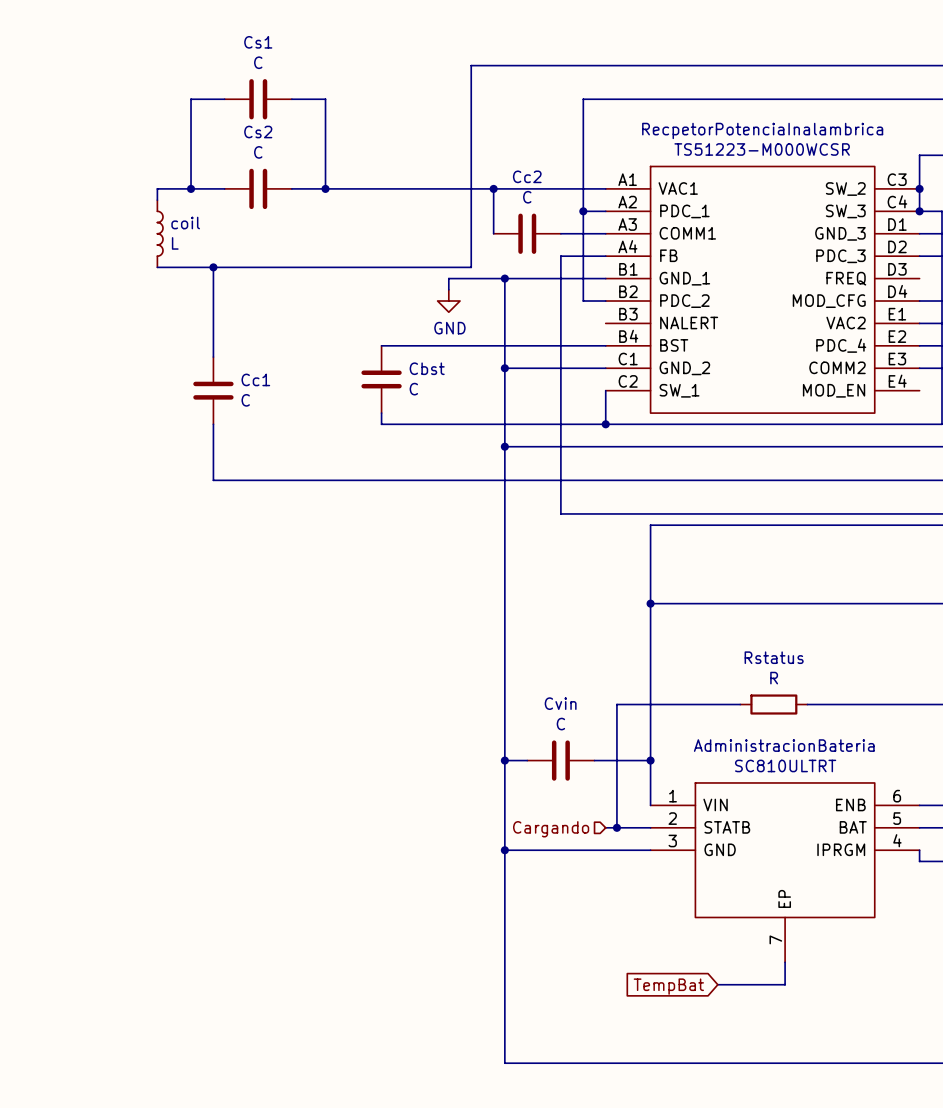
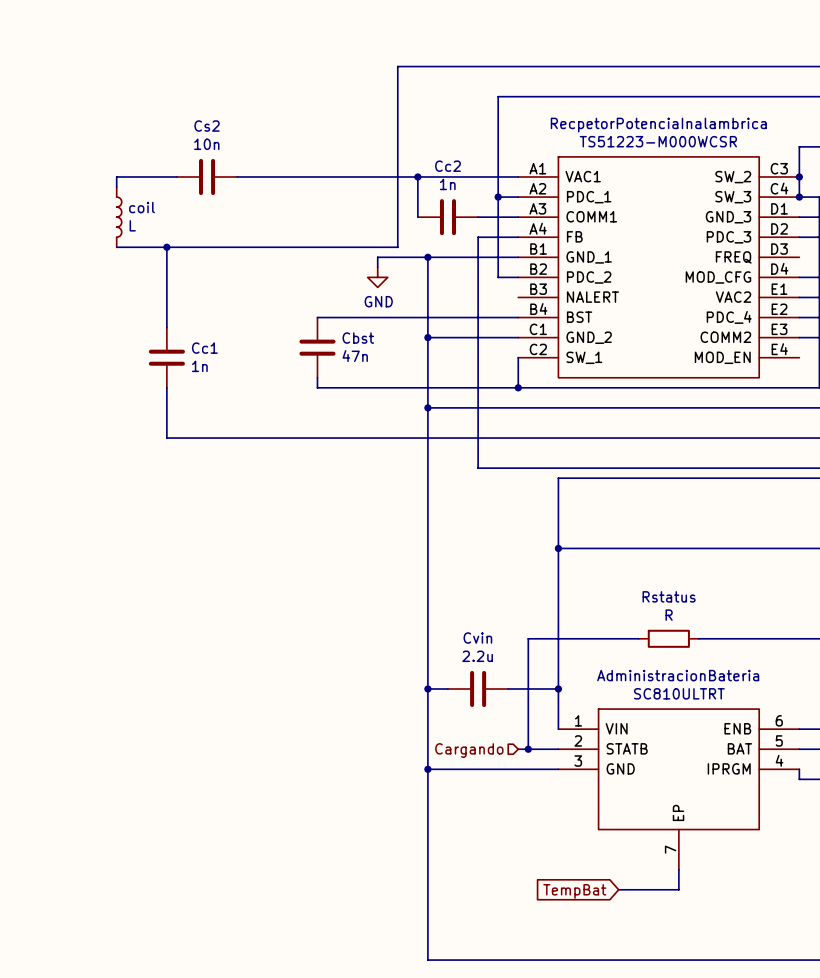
wire: (224, 99) (191, 99) (191, 188) -> none
Cs1: C (258, 99) -> none
wire: (291, 99) (325, 99) (325, 188) -> none
Cs2 value: C (258, 152) -> 10n (206, 144)
junction: (191, 188) -> none
junction: (325, 188) -> none
Cc2 value: C (527, 197) -> 1n (447, 184)
Cbst value: C (413, 389) -> 47n (355, 356)
Cc1 value: C (245, 400) -> 1n (199, 366)
Cvin value: C (560, 724) -> 2.2u (477, 656)

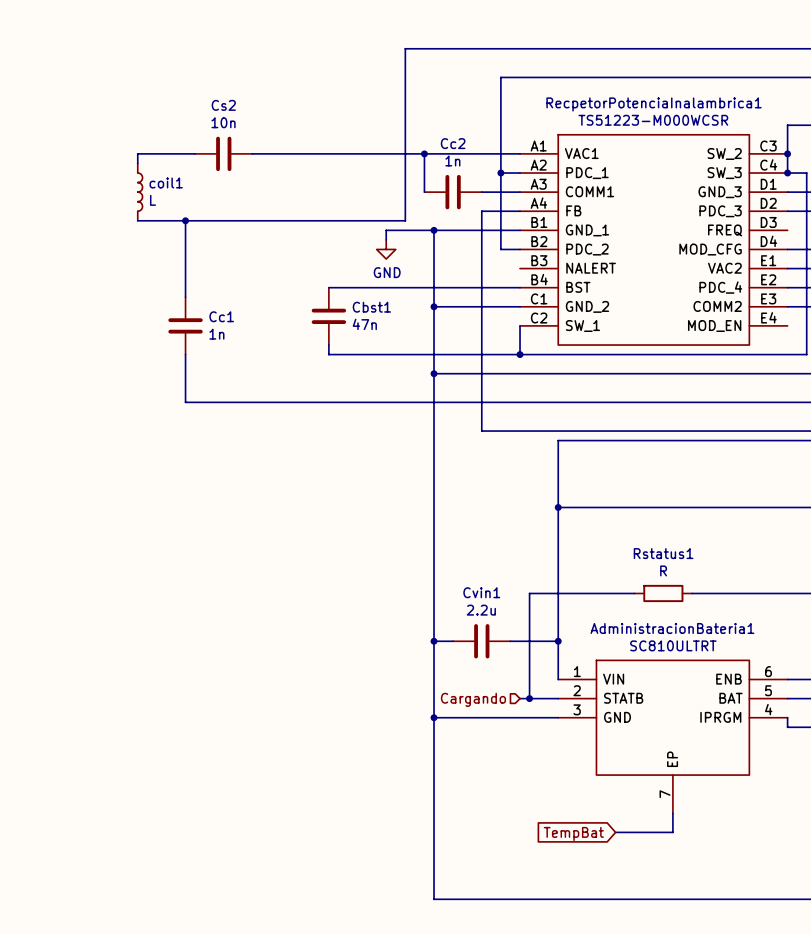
RecpetorPotenciaInalambrica name: RecpetorPotenciaInalambrica (658, 125) -> RecpetorPotenciaInalambrica1 (654, 104)
coil name: coil (142, 207) -> coil1 (166, 182)
Cbst name: Cbst (358, 338) -> Cbst1 (371, 307)
Rstatus name: Rstatus (669, 596) -> Rstatus1 (663, 553)
Cvin name: Cvin (477, 638) -> Cvin1 (481, 592)
AdministracionBateria name: AdministracionBateria (678, 675) -> AdministracionBateria1 (672, 628)

